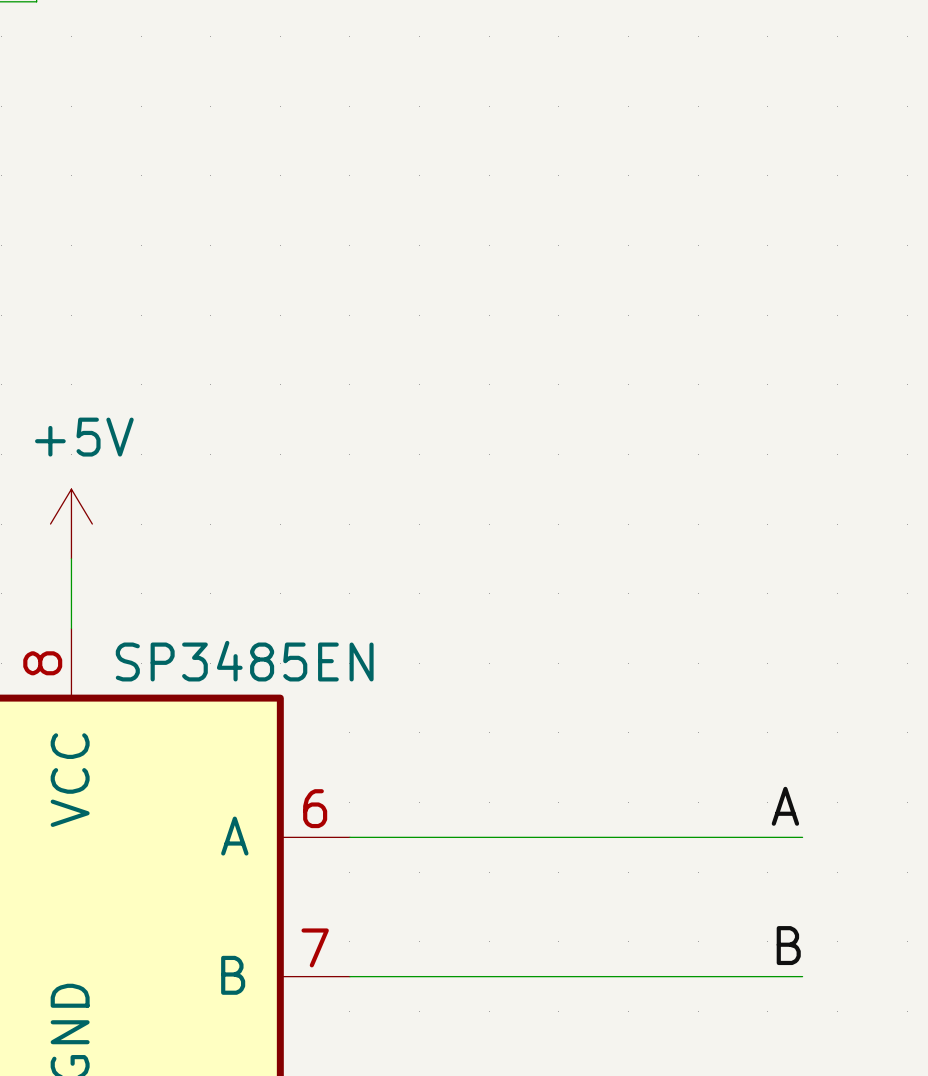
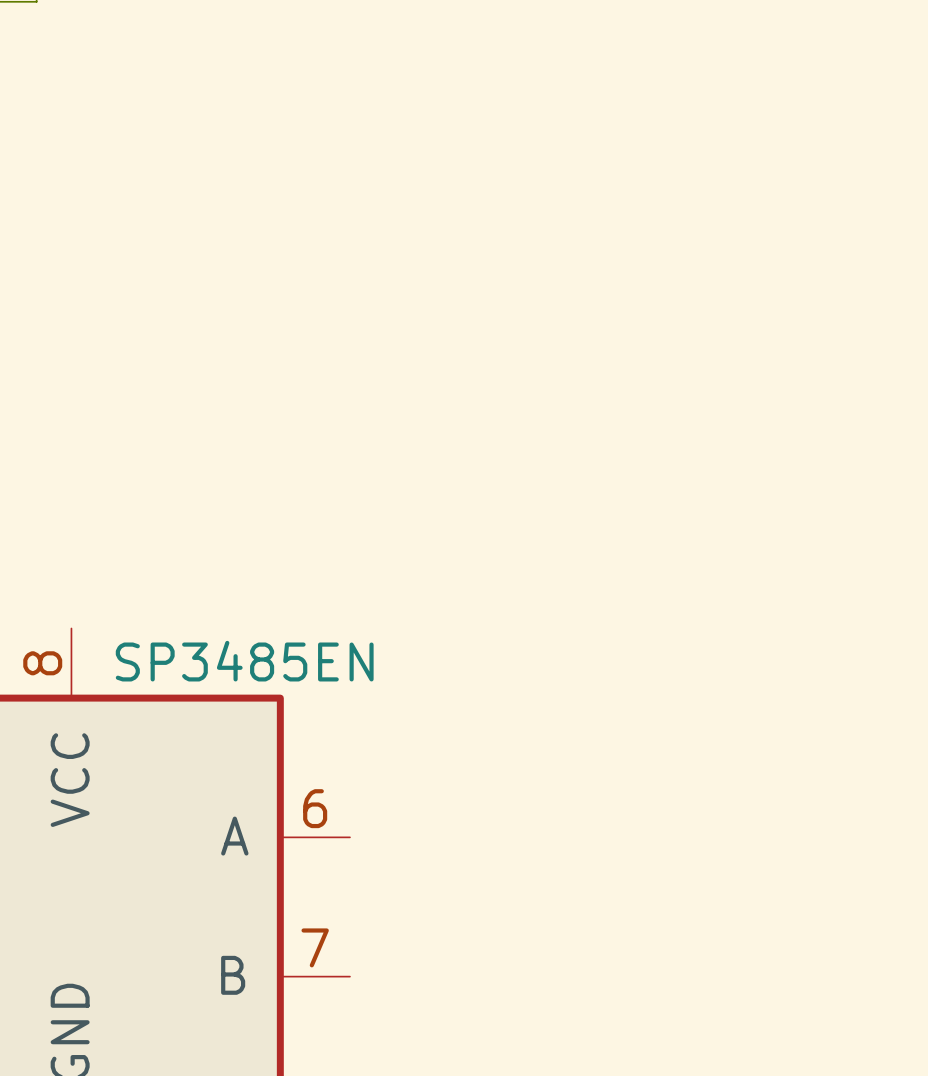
power symbol: +5V (71, 524) -> none
wire: (71, 558) (71, 628) -> none
label: A (785, 806) -> none
wire: (349, 837) (802, 837) -> none
label: B (788, 945) -> none
wire: (349, 976) (802, 976) -> none

